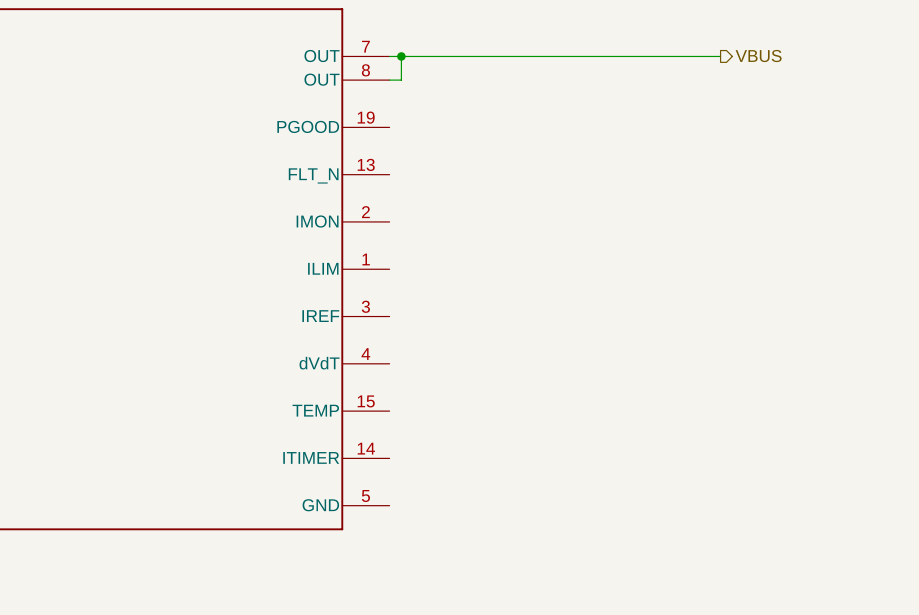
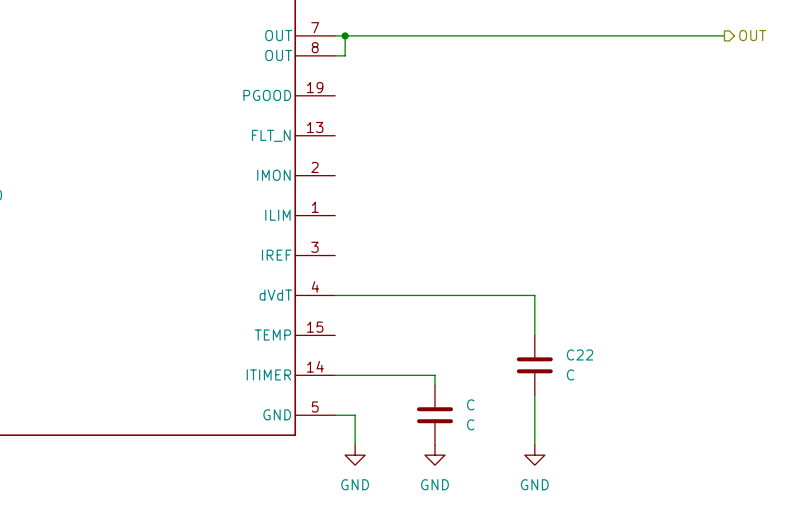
wire: none -> (614, 35) (724, 35)
hierarchical label: VBUS (758, 56) -> none
hierarchical label: none -> OUT (752, 35)
wire: none -> (335, 295) (534, 295) (534, 335)
C22: none -> C (534, 365)
wire: none -> (335, 375) (434, 375) (434, 385)
wire: none -> (534, 395) (534, 445)
wire: none -> (335, 415) (355, 415) (355, 445)
C: none -> C (434, 415)
power symbol: none -> GND (355, 455)
power symbol: none -> GND (434, 455)
power symbol: none -> GND (534, 455)

